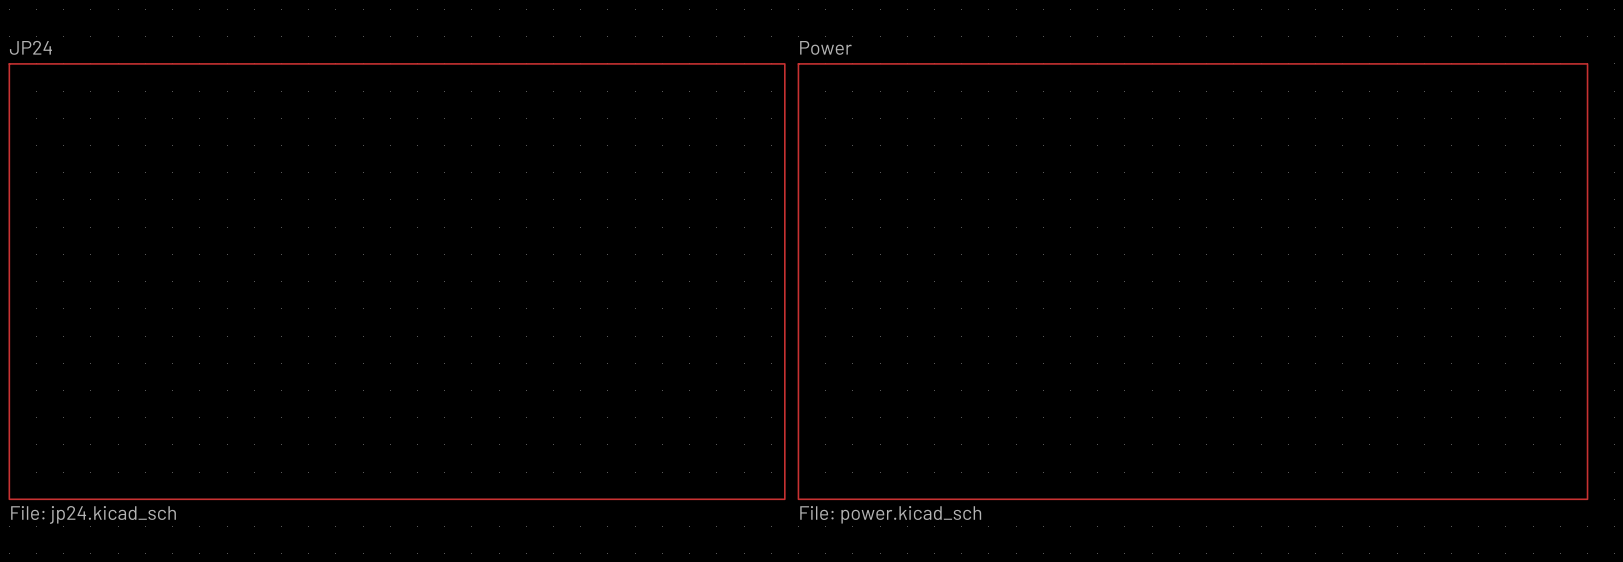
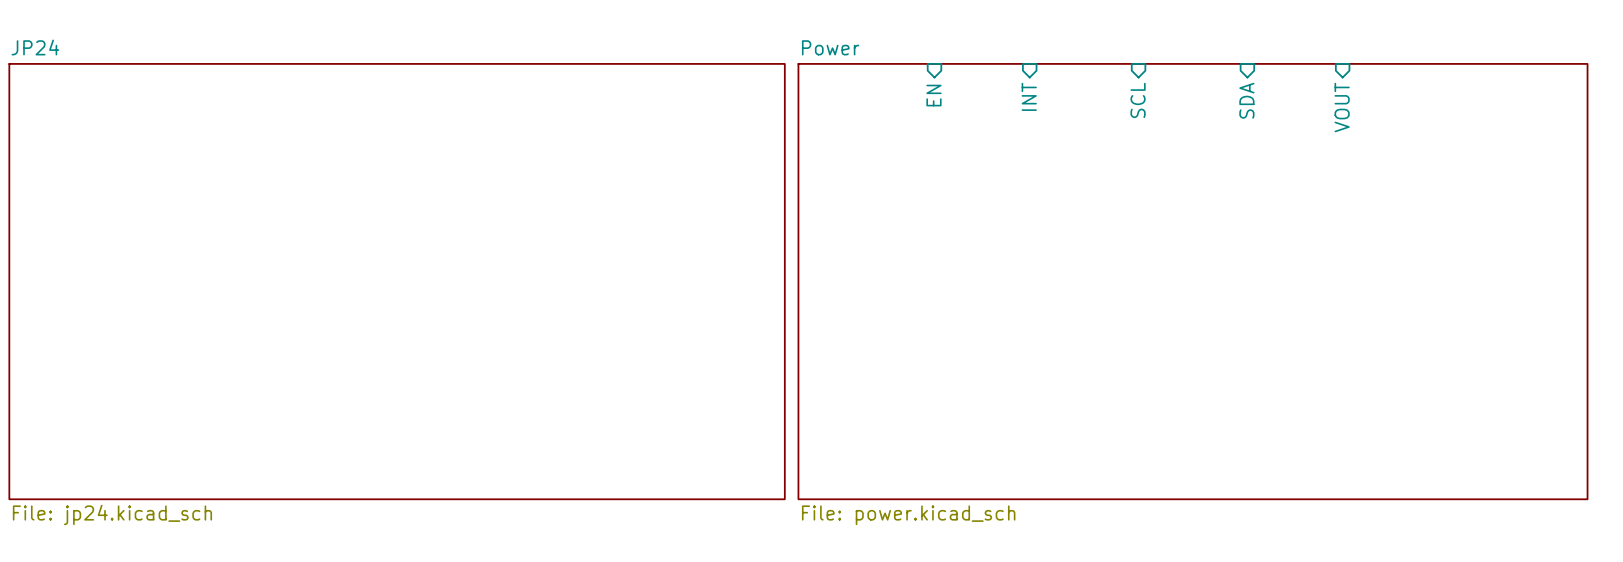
sheet pin: none -> EN (933, 95)
sheet pin: none -> INT (1029, 96)
sheet pin: none -> SCL (1138, 100)
sheet pin: none -> SDA (1246, 100)
sheet pin: none -> VOUT (1342, 107)

